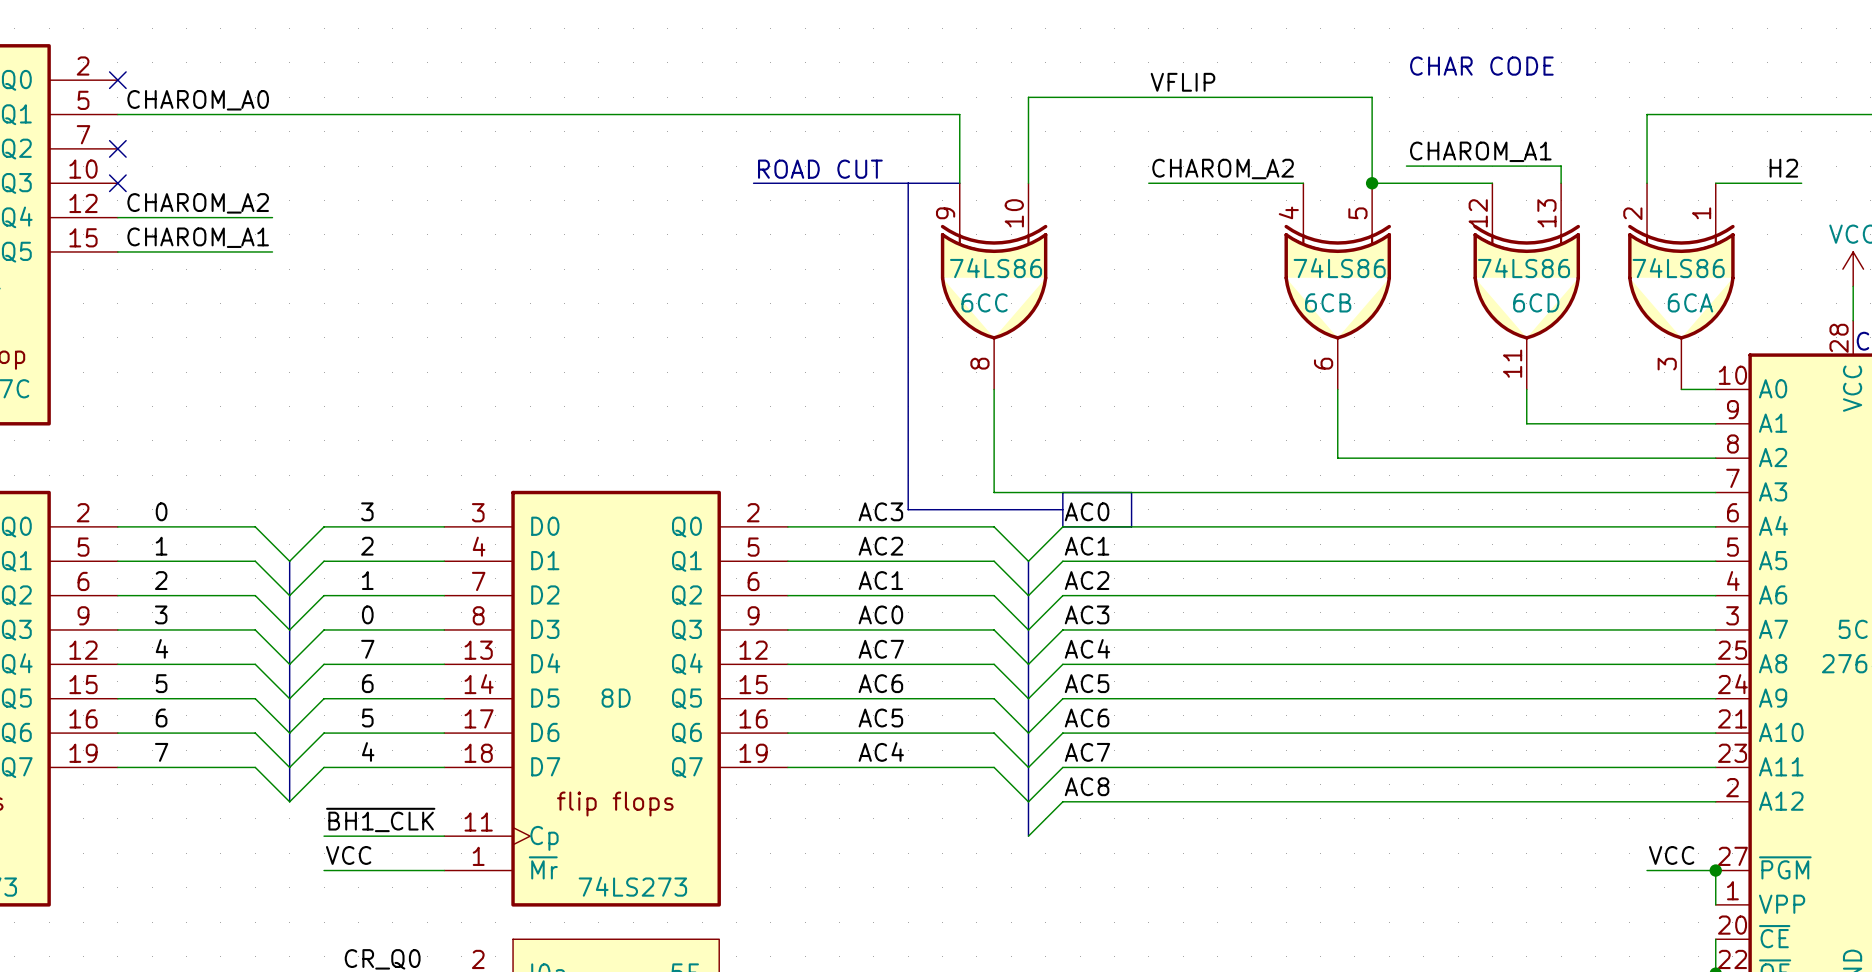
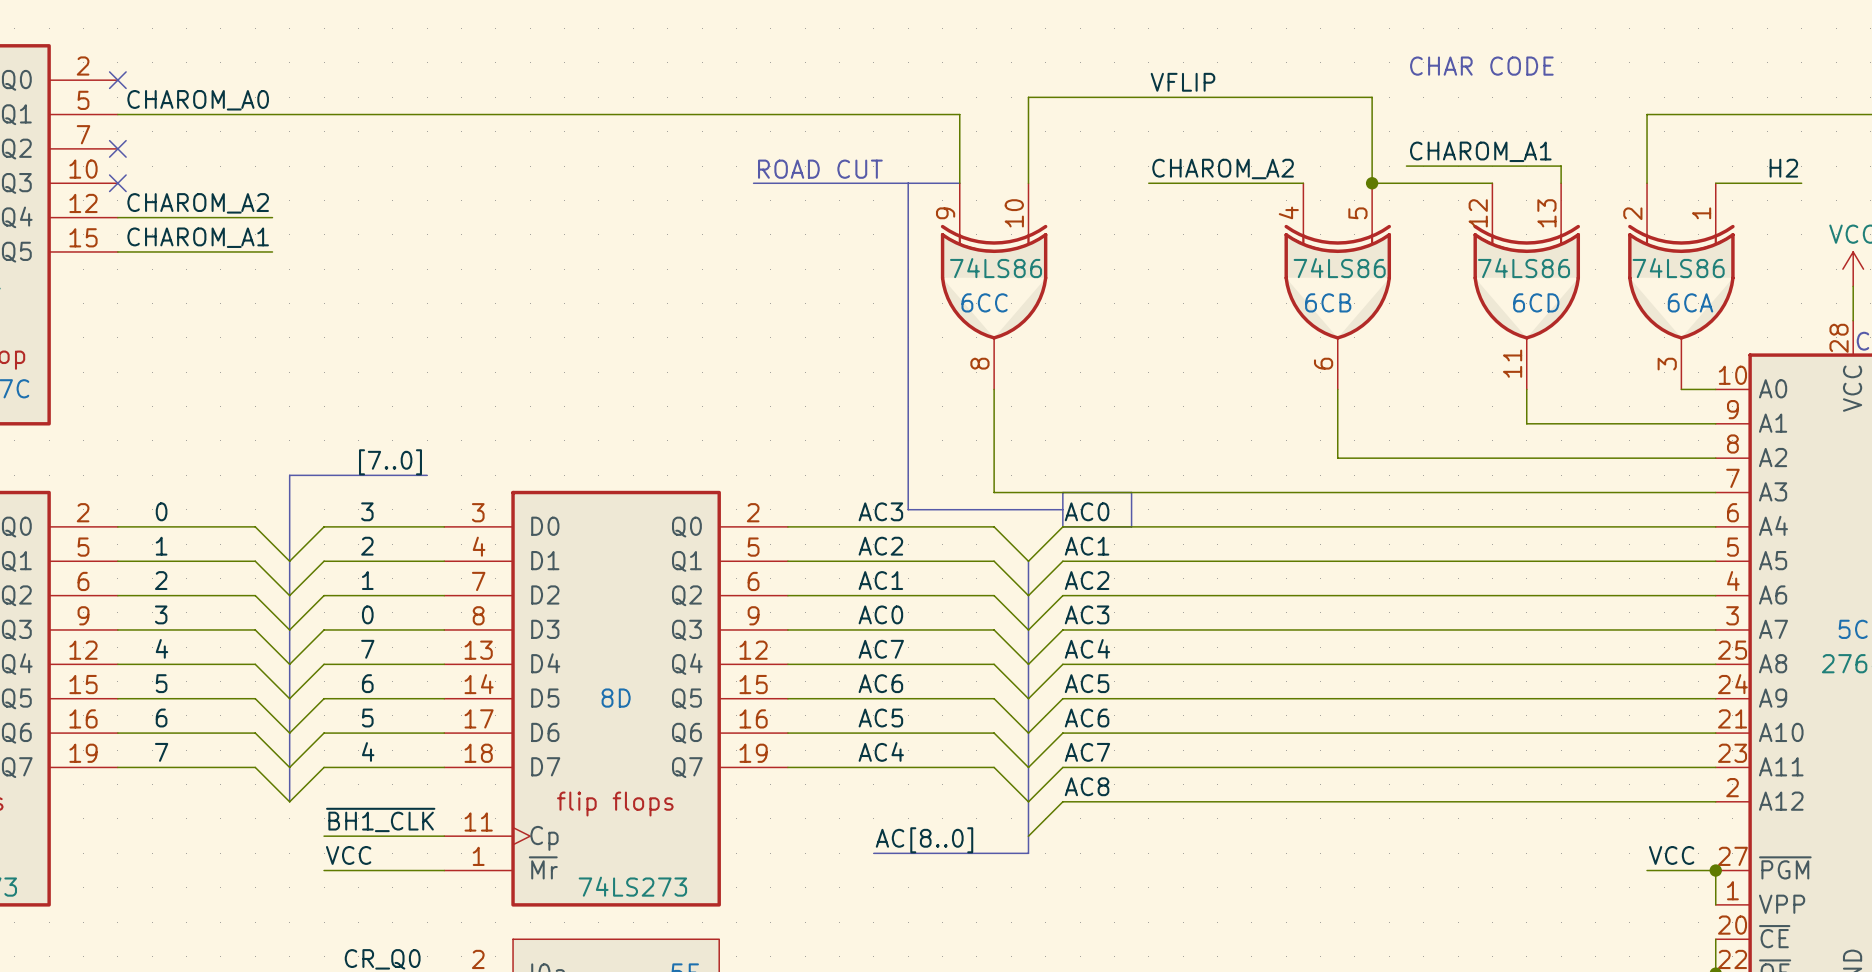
label: none -> [7..0] (390, 462)
bus: none -> (427, 475) (289, 475) (289, 561)
bus: none -> (1028, 836) (1028, 853) (873, 853)
label: none -> AC[8..0] (924, 840)

